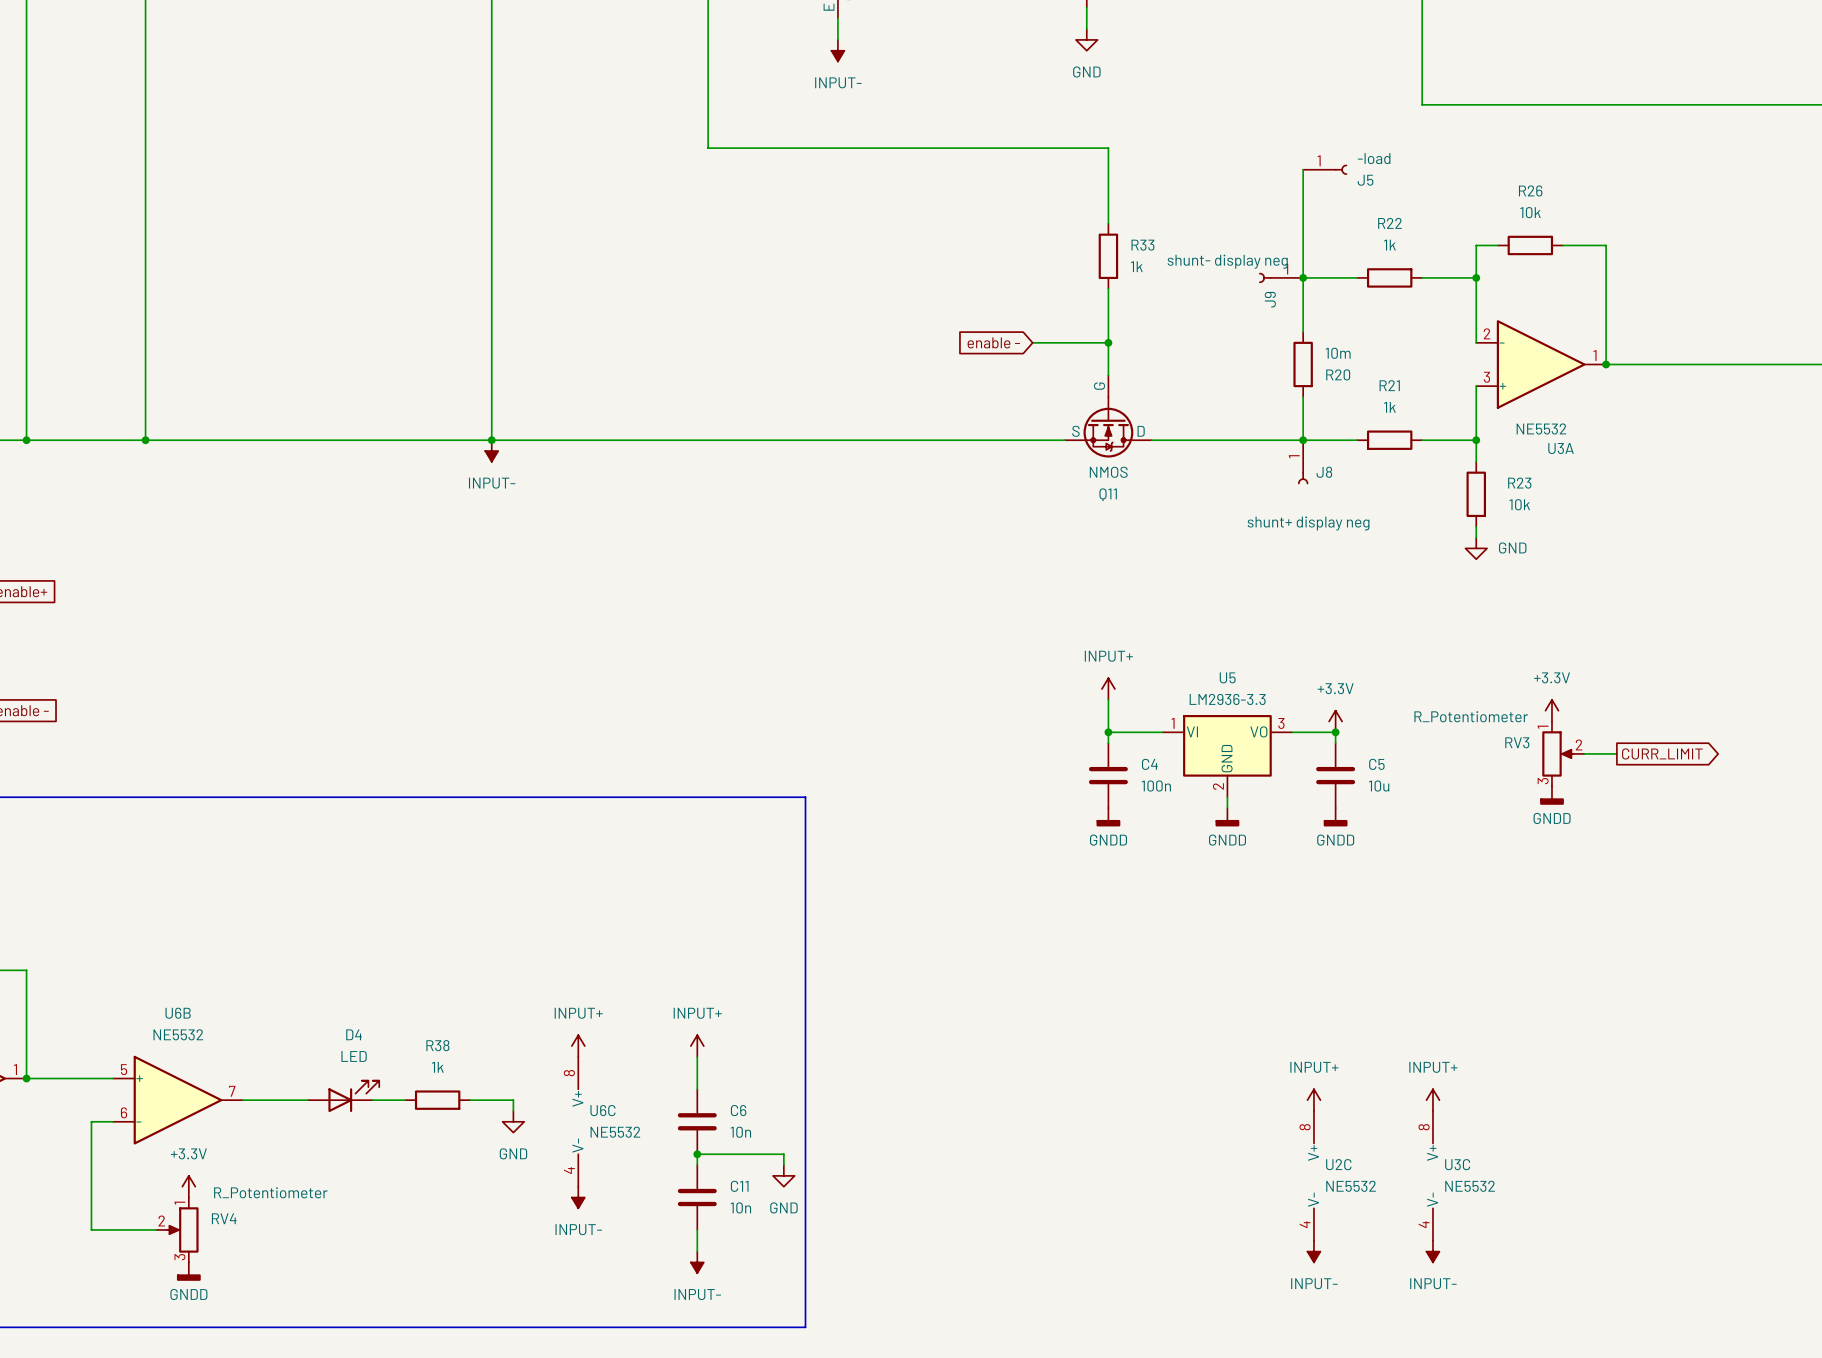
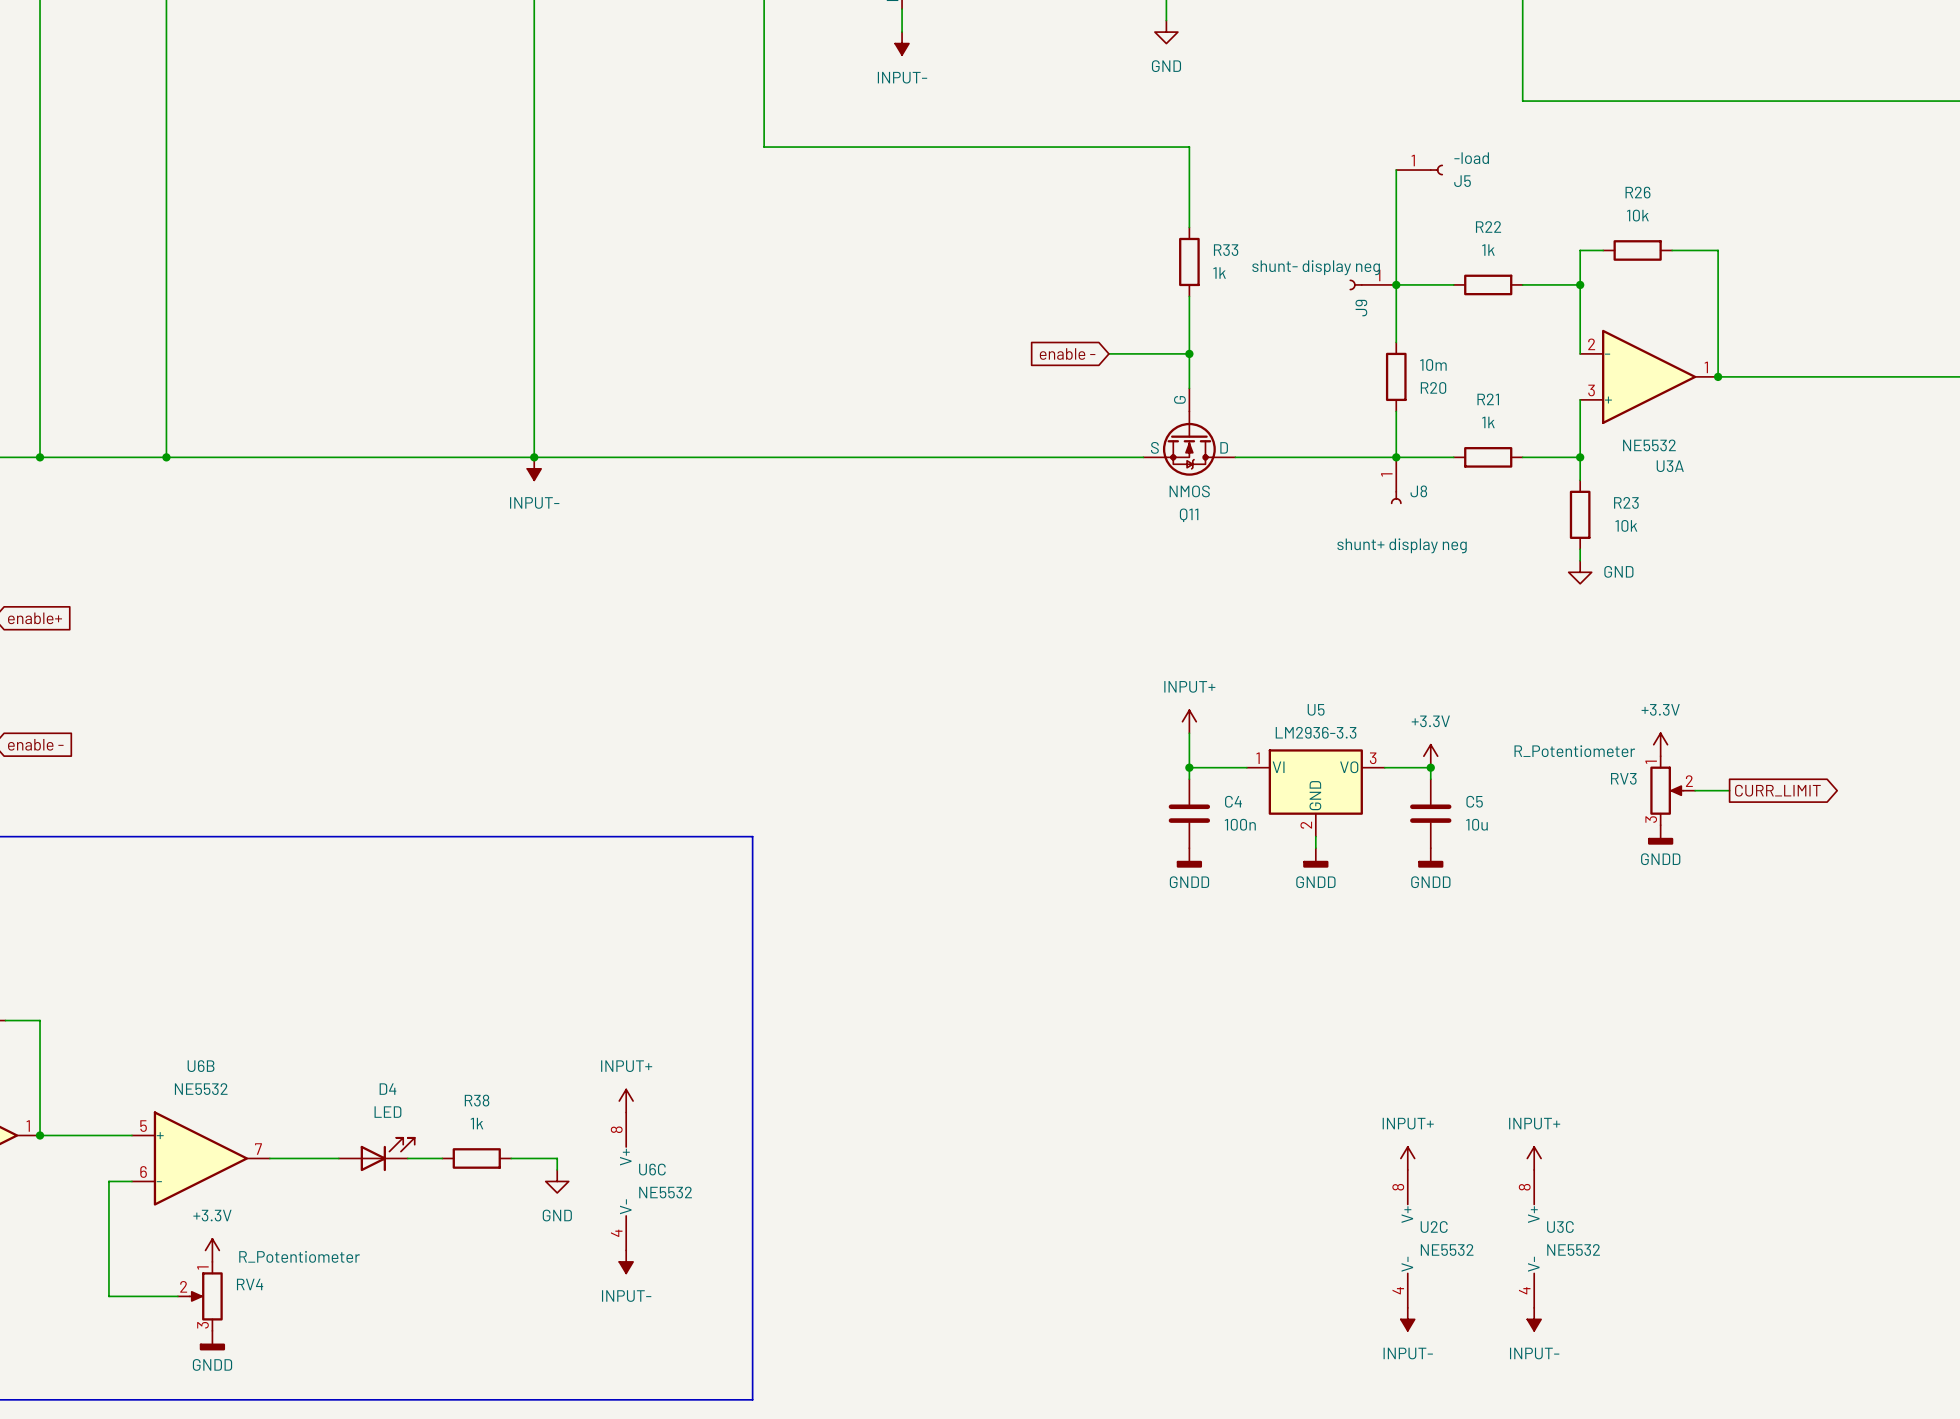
line: (697, 797) (805, 797) (805, 1327) (697, 1327) -> (752, 836) (752, 1399)
power symbol: INPUT+ (697, 1046) -> none
C6: 10n (697, 1121) -> none
junction: (697, 1154) -> none
wire: (697, 1165) (697, 1154) (783, 1154) (783, 1165) -> none
power symbol: GND (783, 1175) -> none
C11: 10n (697, 1197) -> none
power symbol: INPUT- (697, 1262) -> none

